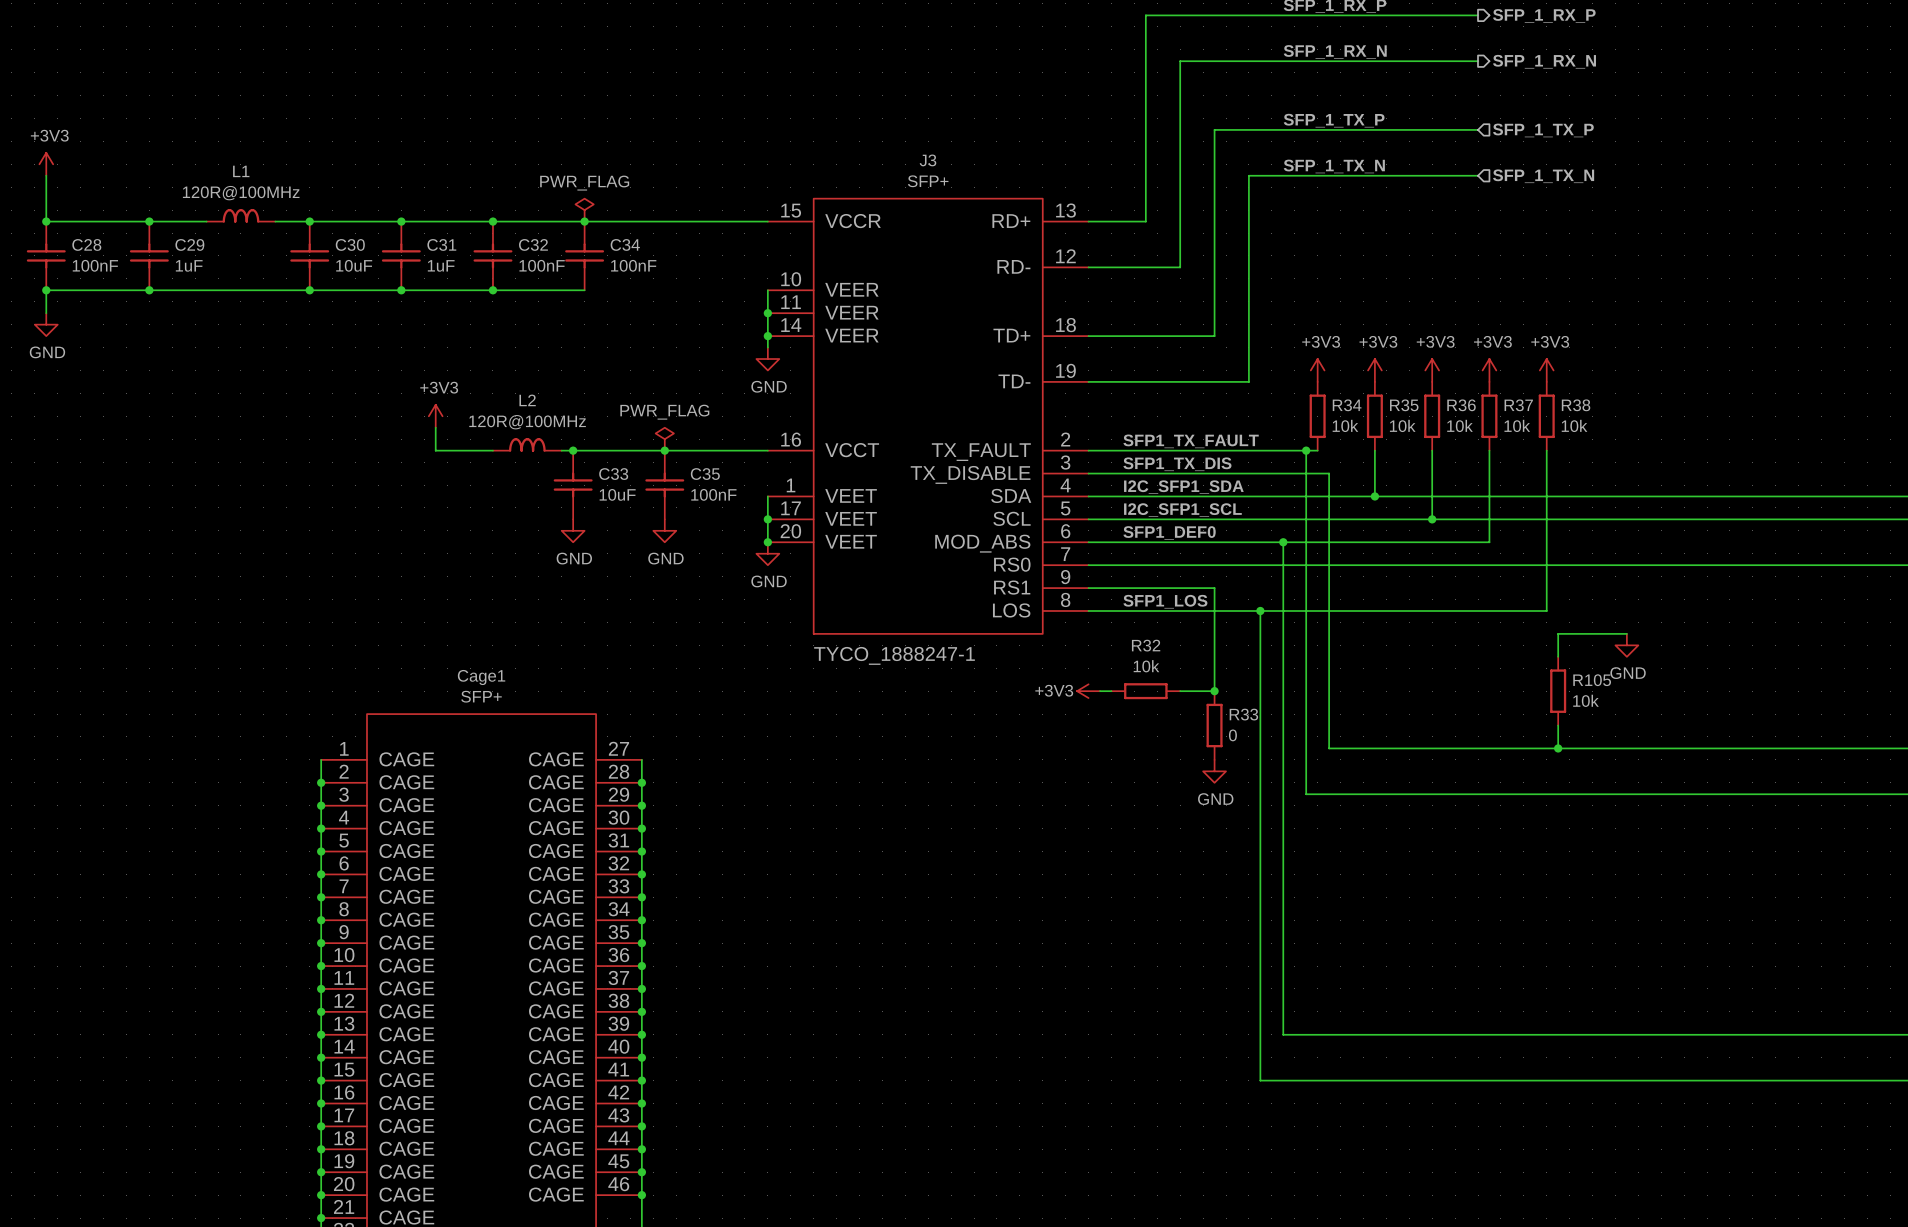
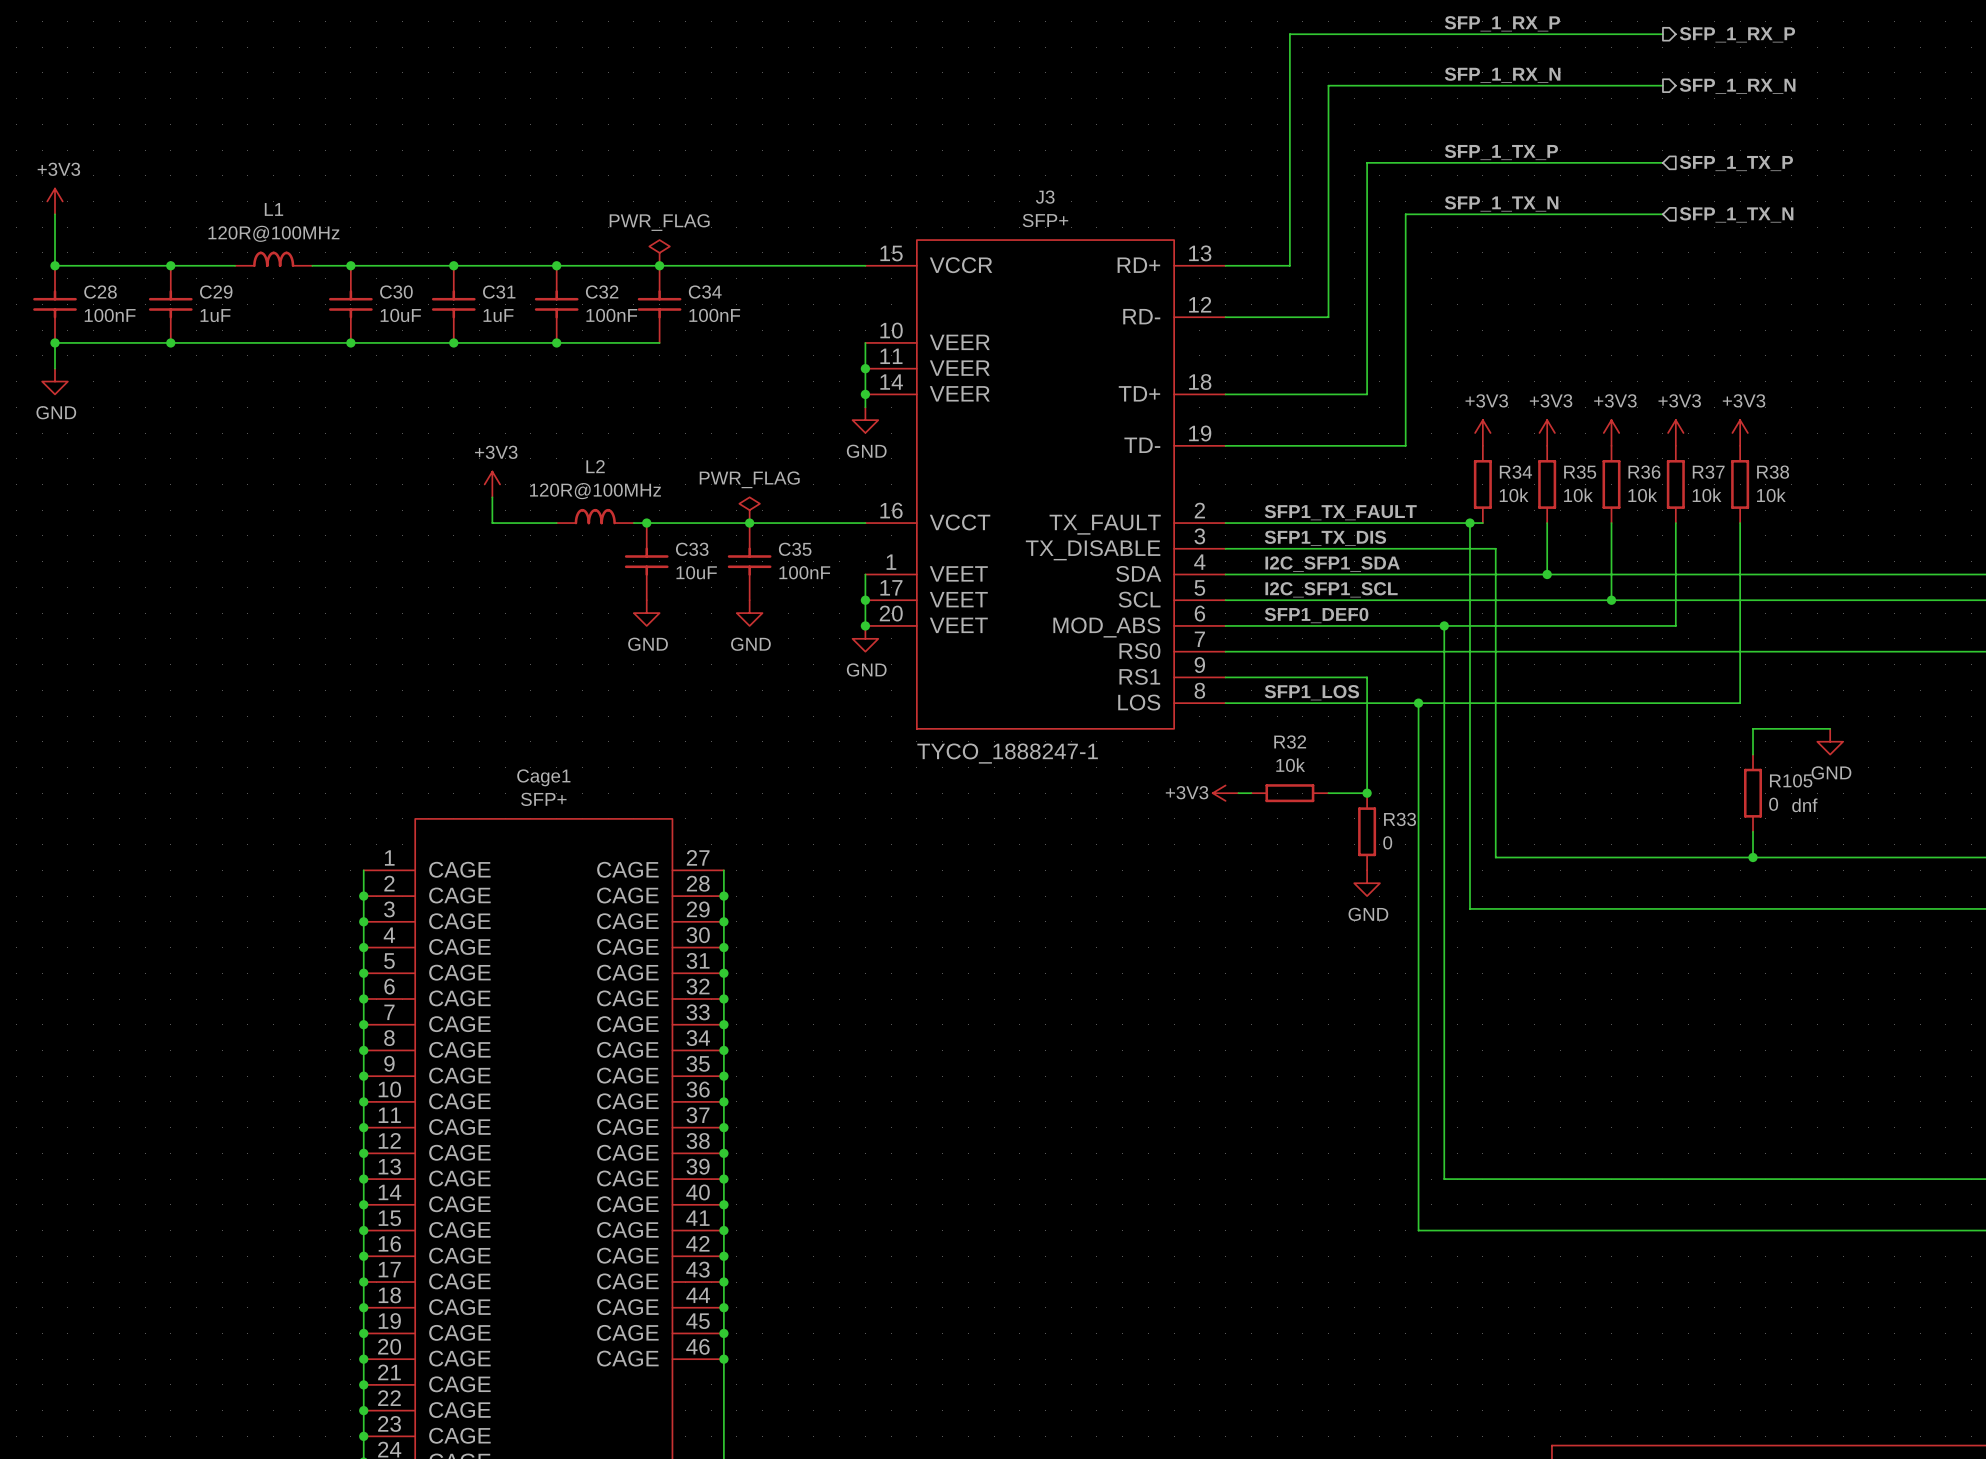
R105 text: 10k (1585, 700) -> 0 (1773, 804)
R105 text: none -> dnf (1804, 805)

